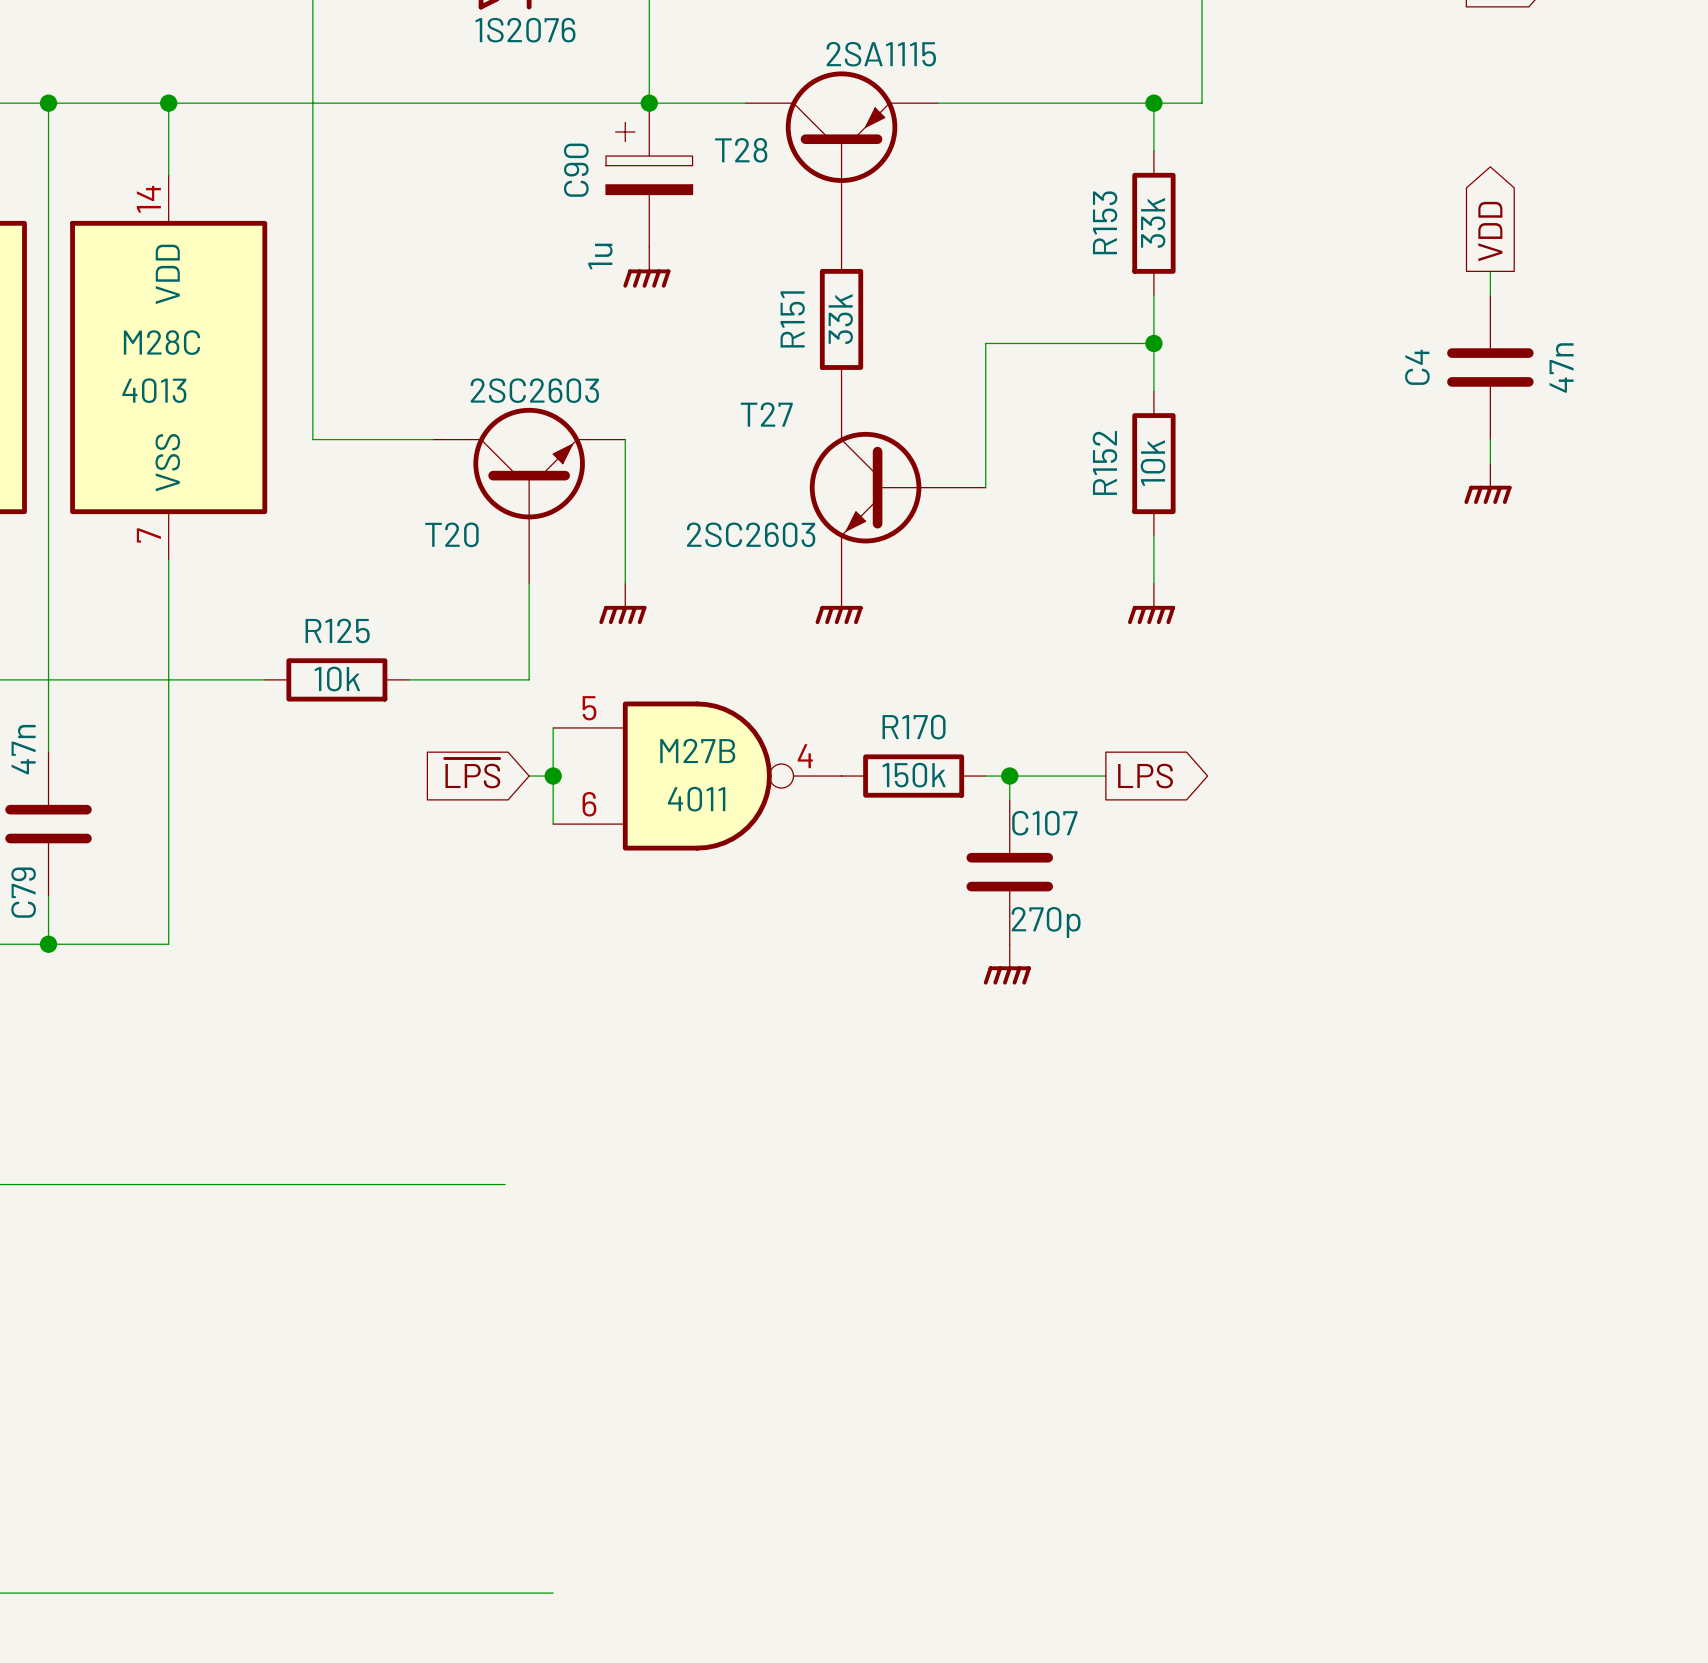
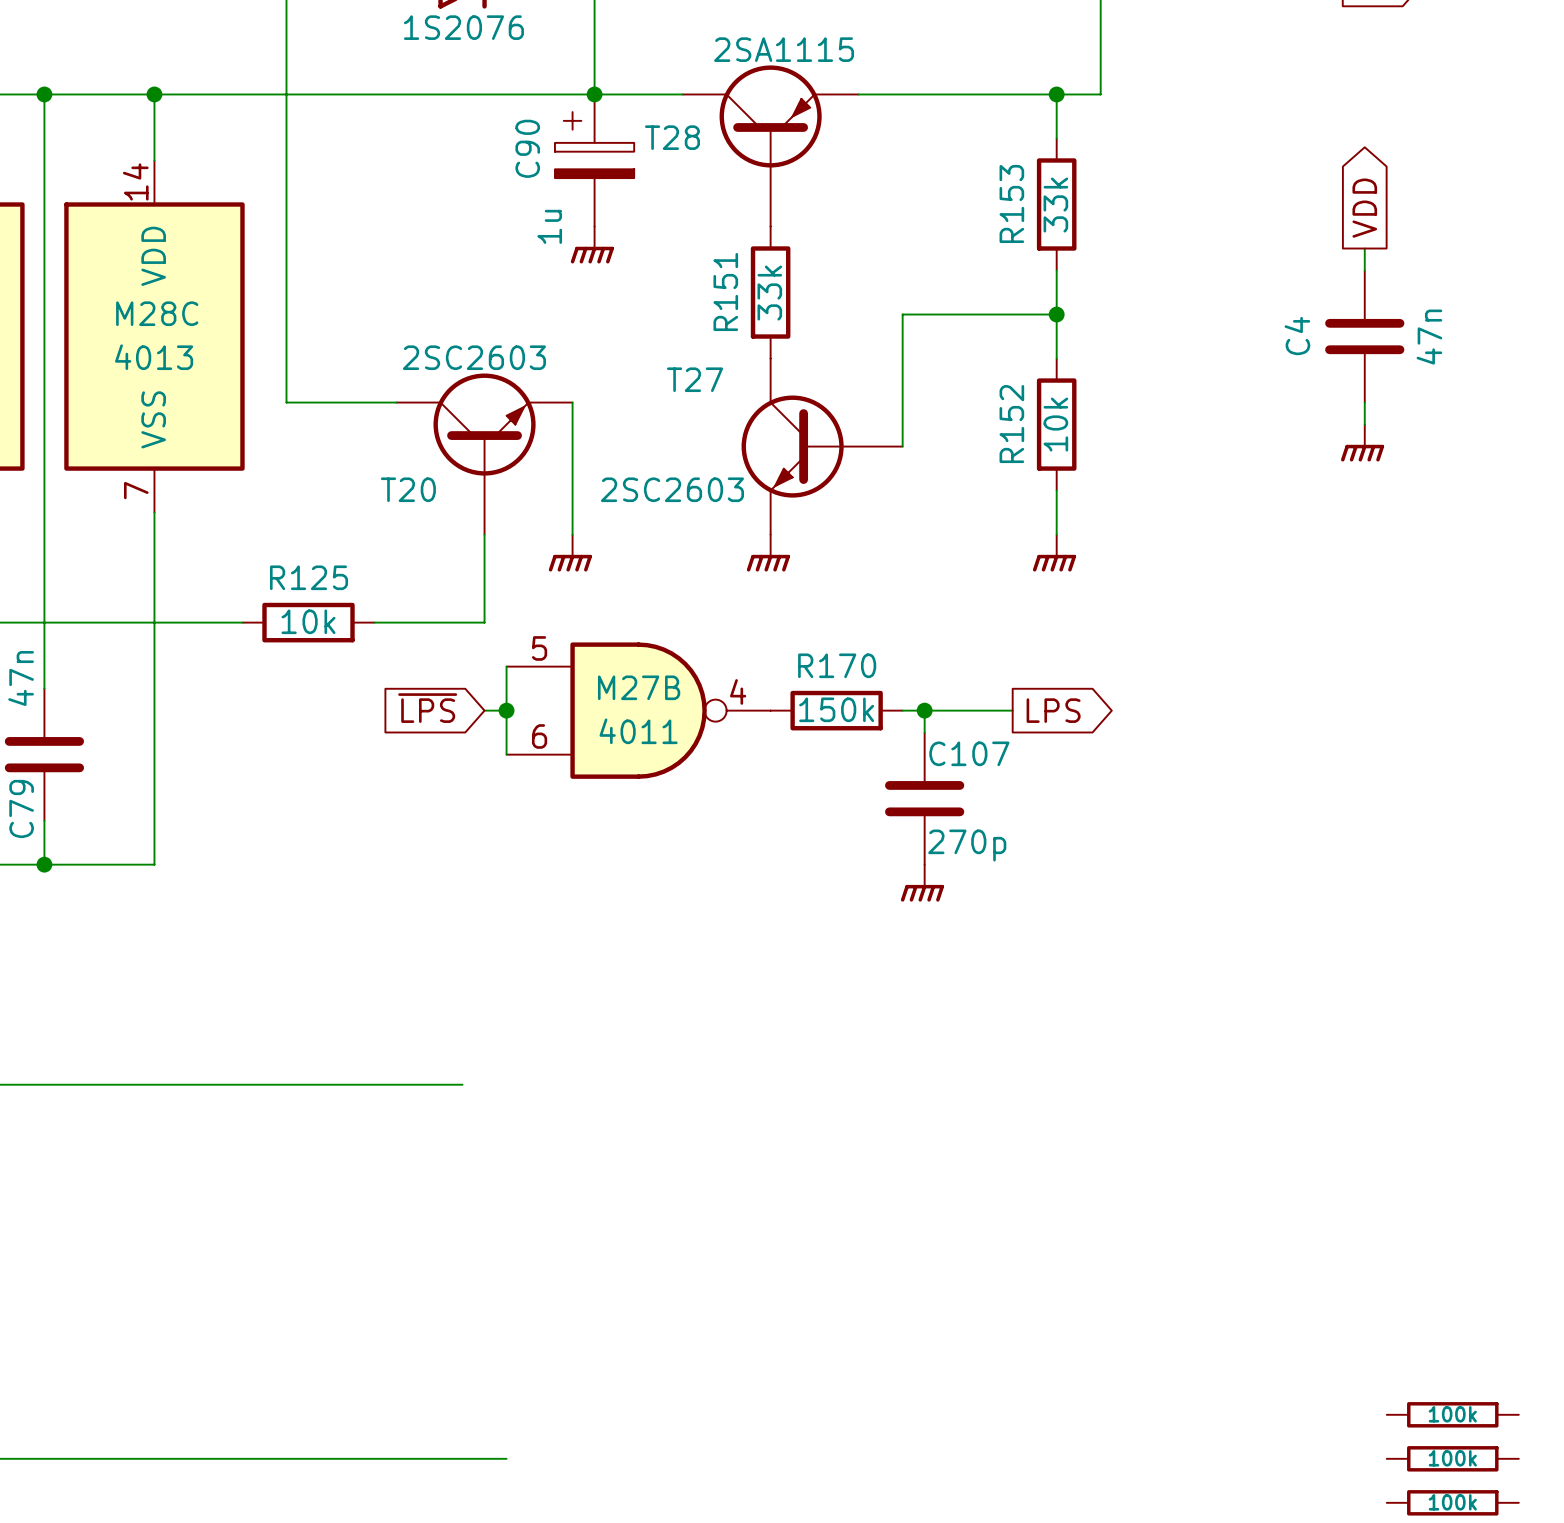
part: none -> 100k (1452, 1414)
part: none -> 100k (1452, 1458)
part: none -> 100k (1452, 1502)

